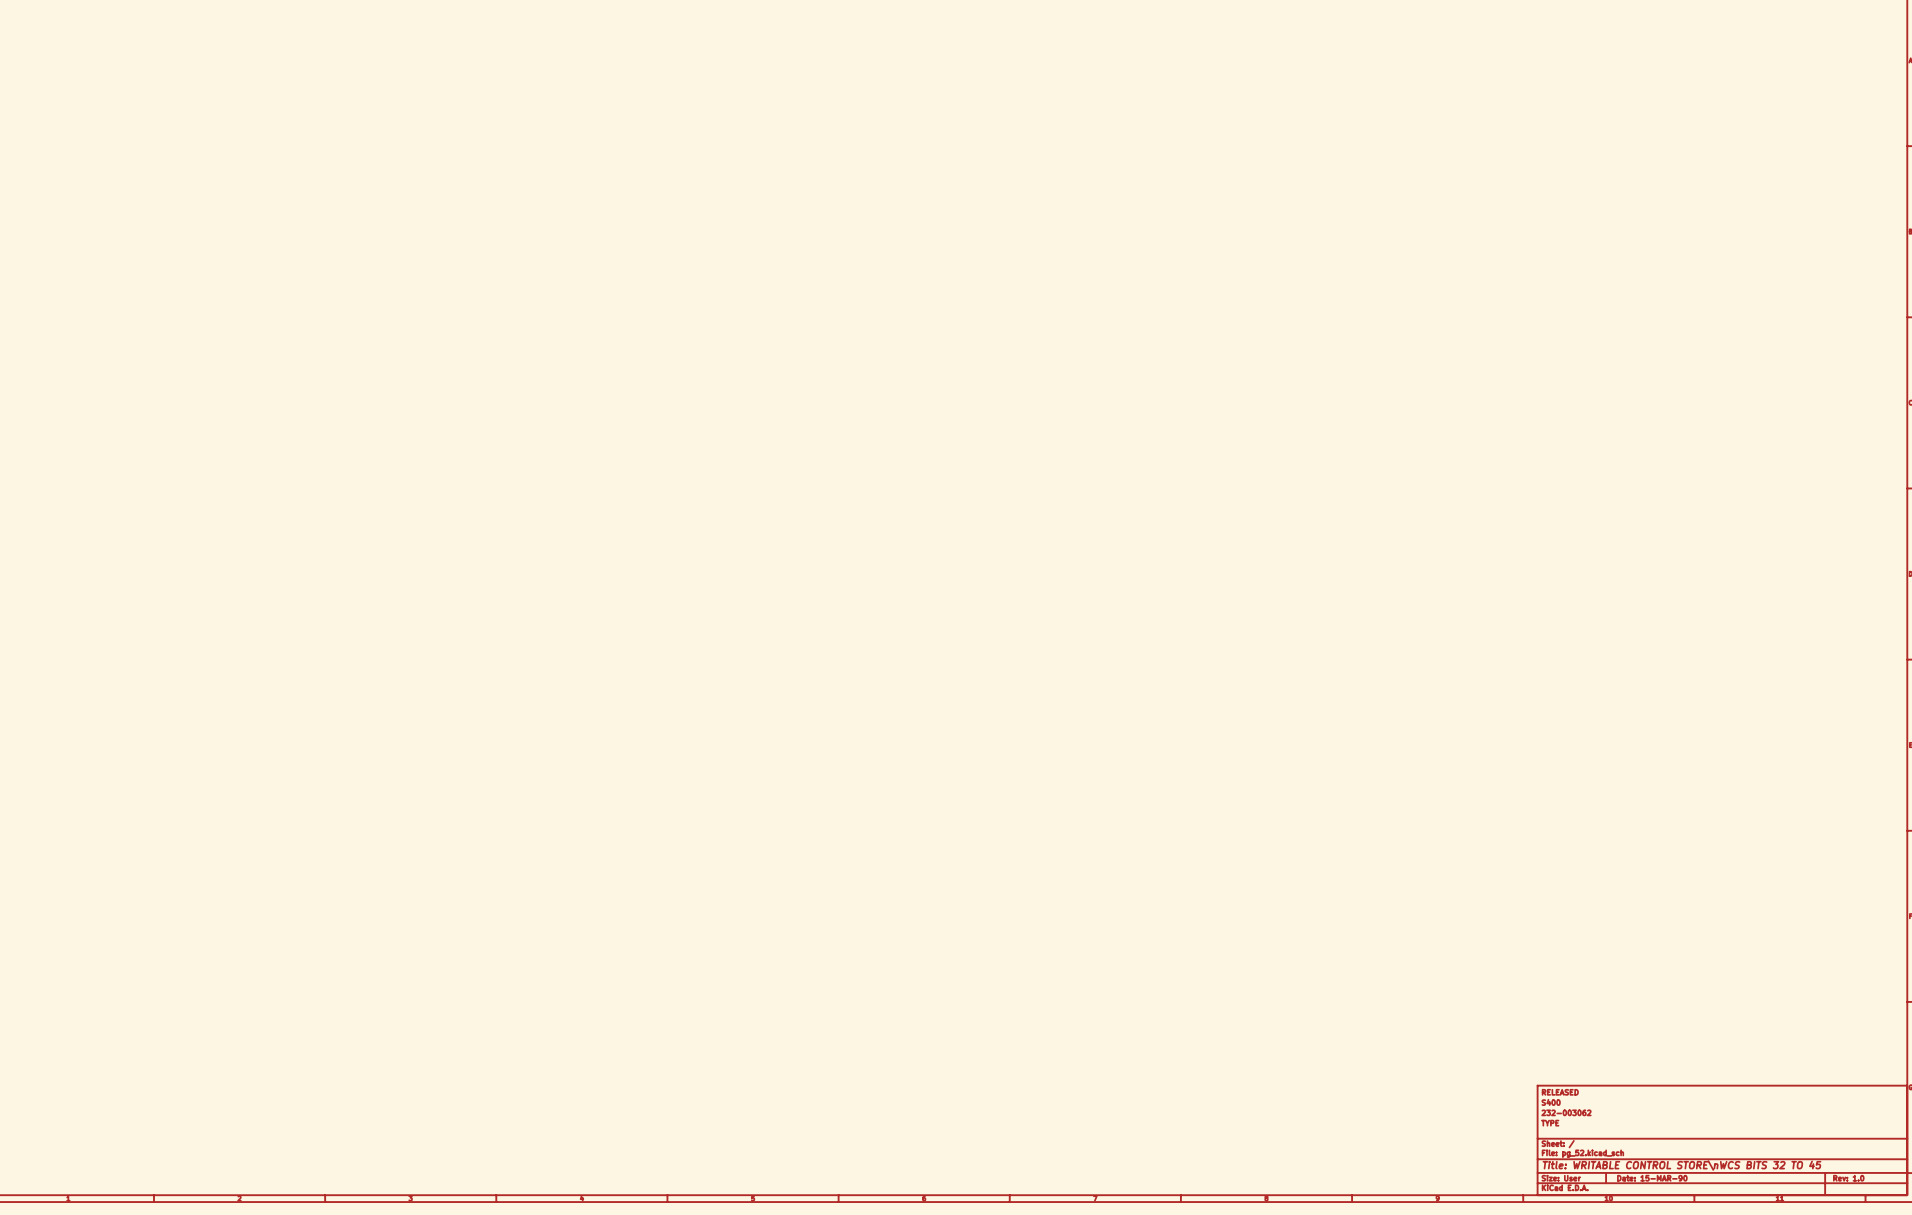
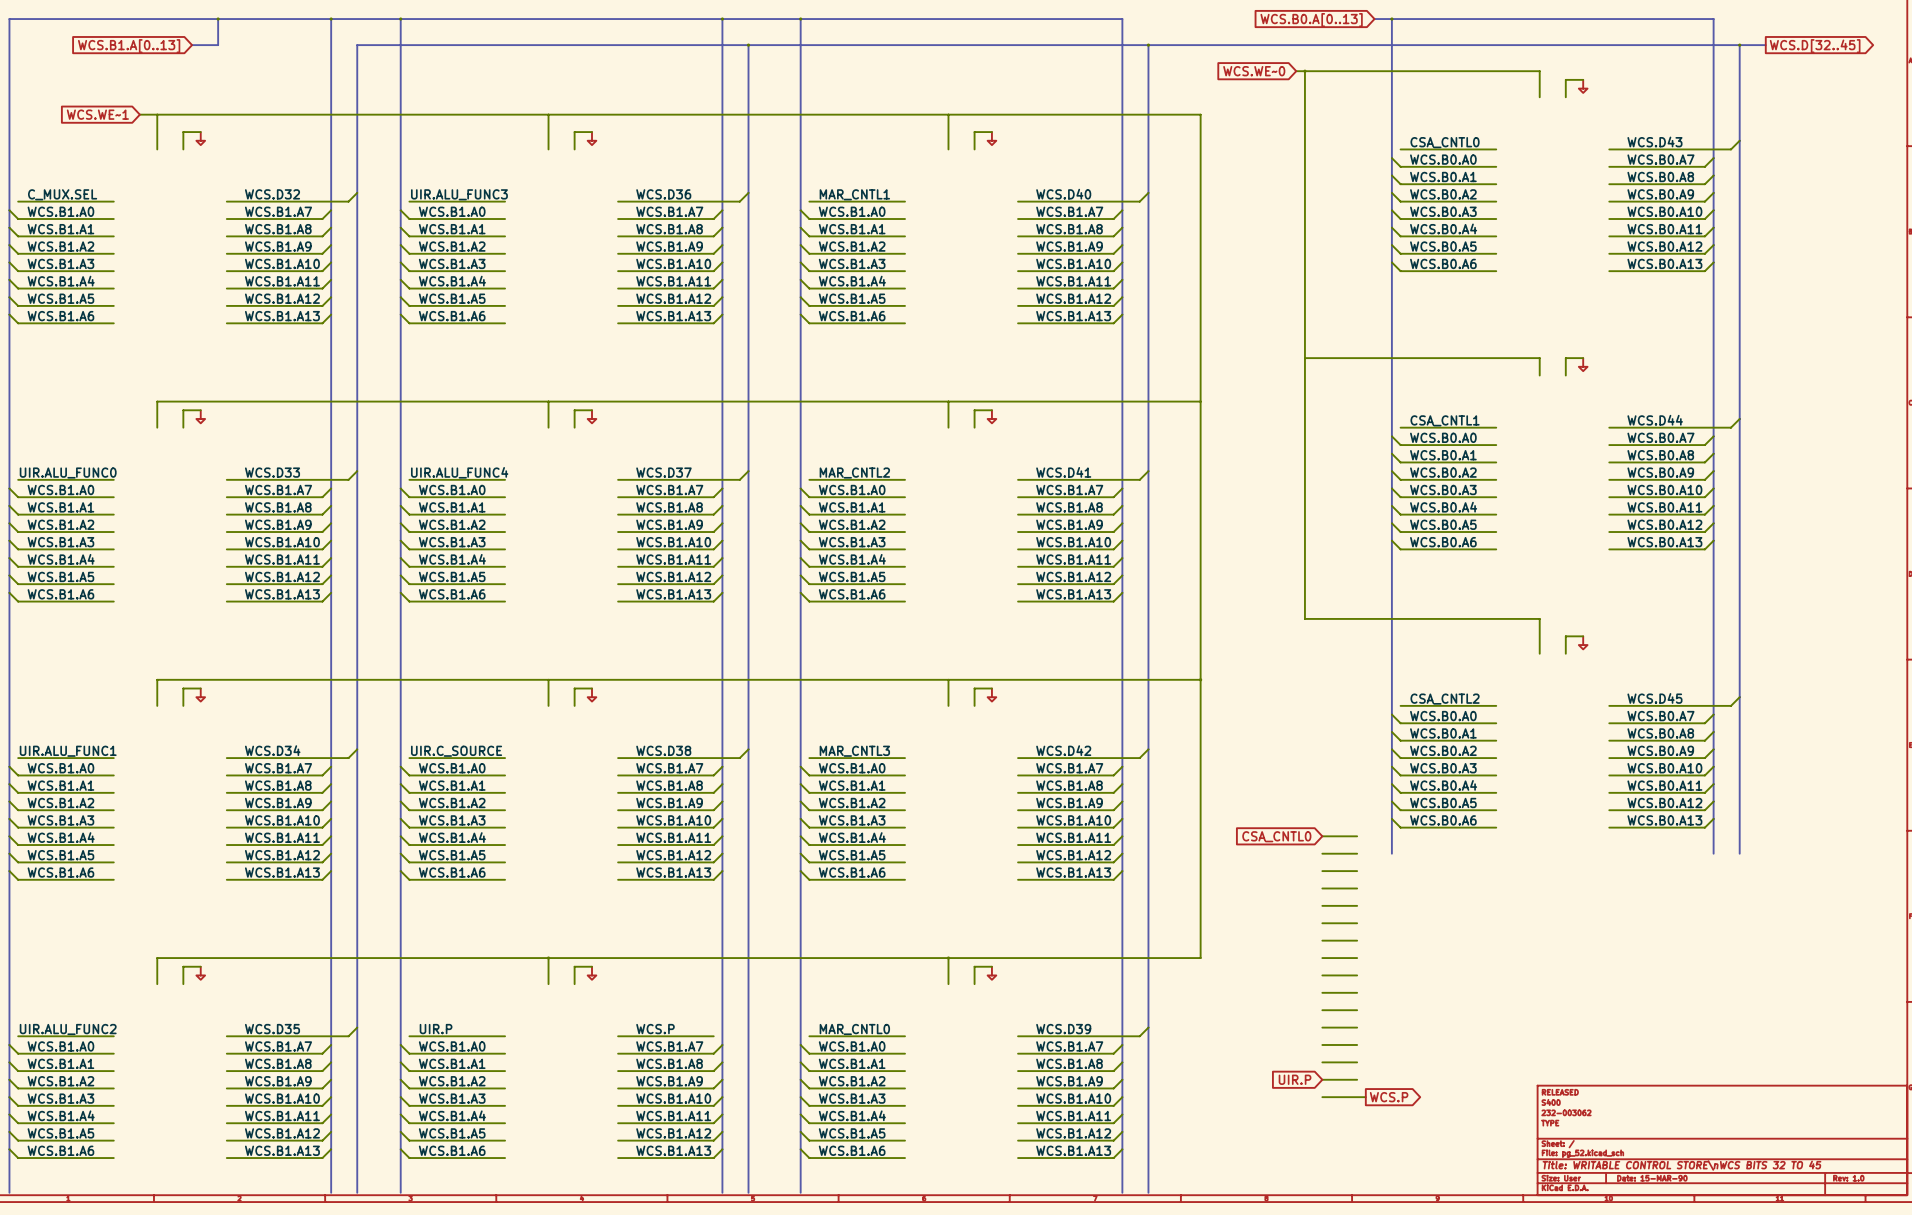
bus: none -> (218, 19) (218, 45) (192, 45)
junction: none -> (218, 19)
bus: none -> (331, 19) (331, 1192)
junction: none -> (331, 19)
bus: none -> (400, 19) (400, 1192)
junction: none -> (400, 19)
bus: none -> (722, 19) (722, 1192)
junction: none -> (722, 19)
bus: none -> (800, 19) (800, 1192)
junction: none -> (800, 19)
bus: none -> (1374, 19) (1713, 19) (1713, 853)
bus: none -> (1391, 19) (1391, 853)
junction: none -> (1391, 19)
global label: none -> WCS.B0.A[0..13] (1311, 20)
bus: none -> (748, 45) (748, 1192)
junction: none -> (748, 45)
bus: none -> (1148, 45) (1148, 1192)
junction: none -> (1148, 45)
bus: none -> (1739, 45) (1739, 853)
junction: none -> (1739, 45)
bus: none -> (1765, 45) (357, 45) (357, 1192)
global label: none -> WCS.B1.A[0..13] (129, 46)
global label: none -> WCS.D[32..45] (1815, 46)
global label: none -> WCS.WE~0 (1254, 71)
wire: none -> (1296, 71) (1539, 71) (1539, 97)
wire: none -> (1304, 71) (1304, 618) (1539, 618) (1539, 653)
wire: none -> (1583, 79) (1565, 79) (1565, 97)
power symbol: none -> (1583, 86)
global label: none -> WCS.WE~1 (97, 114)
wire: none -> (139, 114) (1200, 114) (1200, 958) (157, 958) (157, 984)
wire: none -> (157, 114) (157, 149)
wire: none -> (548, 114) (548, 149)
wire: none -> (948, 114) (948, 149)
wire: none -> (200, 132) (183, 132) (183, 149)
wire: none -> (592, 132) (574, 132) (574, 149)
wire: none -> (991, 132) (974, 132) (974, 149)
power symbol: none -> (200, 138)
power symbol: none -> (592, 138)
power symbol: none -> (991, 138)
wire: none -> (1739, 140) (1731, 149) (1609, 149)
label: none -> CSA_CNTL0 (1445, 142)
label: none -> WCS.D43 (1654, 142)
wire: none -> (1400, 149) (1496, 149)
wire: none -> (1391, 158) (1400, 166) (1496, 166)
wire: none -> (1713, 158) (1704, 166) (1609, 166)
label: none -> WCS.B0.A0 (1443, 159)
label: none -> WCS.B0.A7 (1660, 159)
wire: none -> (1391, 175) (1400, 184) (1496, 184)
wire: none -> (1713, 175) (1704, 184) (1609, 184)
label: none -> WCS.B0.A1 (1443, 176)
label: none -> WCS.B0.A8 (1660, 176)
wire: none -> (357, 192) (348, 201) (226, 201)
wire: none -> (748, 192) (739, 201) (618, 201)
wire: none -> (1148, 192) (1139, 201) (1018, 201)
wire: none -> (1391, 192) (1400, 201) (1496, 201)
wire: none -> (1713, 192) (1704, 201) (1609, 201)
label: none -> C_MUX.SEL (62, 194)
label: none -> WCS.D32 (272, 194)
label: none -> UIR.ALU_FUNC3 (459, 194)
label: none -> WCS.D36 (663, 194)
label: none -> MAR_CNTL1 (854, 194)
label: none -> WCS.D40 (1063, 194)
label: none -> WCS.B0.A2 (1443, 194)
label: none -> WCS.B0.A9 (1660, 194)
wire: none -> (18, 201) (113, 201)
wire: none -> (409, 201) (505, 201)
wire: none -> (809, 201) (905, 201)
wire: none -> (9, 210) (18, 219) (113, 219)
wire: none -> (331, 210) (322, 219) (226, 219)
wire: none -> (400, 210) (409, 219) (505, 219)
wire: none -> (722, 210) (713, 219) (618, 219)
wire: none -> (800, 210) (809, 219) (905, 219)
wire: none -> (1122, 210) (1113, 219) (1018, 219)
wire: none -> (1391, 210) (1400, 219) (1496, 219)
wire: none -> (1713, 210) (1704, 219) (1609, 219)
label: none -> WCS.B1.A0 (60, 211)
label: none -> WCS.B1.A7 (278, 211)
label: none -> WCS.B1.A0 (452, 211)
label: none -> WCS.B1.A7 (669, 211)
label: none -> WCS.B1.A0 (852, 211)
label: none -> WCS.B1.A7 (1069, 211)
label: none -> WCS.B0.A3 (1443, 211)
label: none -> WCS.B0.A10 (1664, 211)
wire: none -> (9, 227) (18, 236) (113, 236)
wire: none -> (331, 227) (322, 236) (226, 236)
wire: none -> (400, 227) (409, 236) (505, 236)
wire: none -> (722, 227) (713, 236) (618, 236)
wire: none -> (800, 227) (809, 236) (905, 236)
wire: none -> (1122, 227) (1113, 236) (1018, 236)
wire: none -> (1391, 227) (1400, 236) (1496, 236)
wire: none -> (1713, 227) (1704, 236) (1609, 236)
label: none -> WCS.B0.A4 (1443, 228)
label: none -> WCS.B1.A1 (60, 229)
label: none -> WCS.B1.A8 (278, 229)
label: none -> WCS.B1.A1 (452, 229)
label: none -> WCS.B1.A8 (669, 229)
label: none -> WCS.B1.A1 (852, 229)
label: none -> WCS.B1.A8 (1069, 229)
label: none -> WCS.B0.A11 (1664, 229)
wire: none -> (9, 245) (18, 253) (113, 253)
wire: none -> (331, 245) (322, 253) (226, 253)
wire: none -> (400, 245) (409, 253) (505, 253)
wire: none -> (722, 245) (713, 253) (618, 253)
wire: none -> (800, 245) (809, 253) (905, 253)
wire: none -> (1122, 245) (1113, 253) (1018, 253)
wire: none -> (1391, 245) (1400, 253) (1496, 253)
wire: none -> (1713, 245) (1704, 253) (1609, 253)
label: none -> WCS.B1.A2 (60, 246)
label: none -> WCS.B1.A9 (278, 246)
label: none -> WCS.B1.A2 (452, 246)
label: none -> WCS.B1.A9 (669, 246)
label: none -> WCS.B1.A2 (852, 246)
label: none -> WCS.B1.A9 (1069, 246)
label: none -> WCS.B0.A5 (1443, 246)
label: none -> WCS.B0.A12 (1664, 246)
wire: none -> (9, 262) (18, 271) (113, 271)
wire: none -> (331, 262) (322, 271) (226, 271)
wire: none -> (400, 262) (409, 271) (505, 271)
wire: none -> (722, 262) (713, 271) (618, 271)
wire: none -> (800, 262) (809, 271) (905, 271)
wire: none -> (1122, 262) (1113, 271) (1018, 271)
wire: none -> (1391, 262) (1400, 271) (1496, 271)
wire: none -> (1713, 262) (1704, 271) (1609, 271)
label: none -> WCS.B1.A3 (60, 263)
label: none -> WCS.B1.A10 (282, 263)
label: none -> WCS.B1.A3 (452, 263)
label: none -> WCS.B1.A10 (673, 263)
label: none -> WCS.B1.A3 (852, 263)
label: none -> WCS.B1.A10 (1073, 263)
label: none -> WCS.B0.A6 (1443, 263)
label: none -> WCS.B0.A13 (1664, 263)
wire: none -> (9, 279) (18, 288) (113, 288)
wire: none -> (331, 279) (322, 288) (226, 288)
wire: none -> (400, 279) (409, 288) (505, 288)
wire: none -> (722, 279) (713, 288) (618, 288)
wire: none -> (800, 279) (809, 288) (905, 288)
wire: none -> (1122, 279) (1113, 288) (1018, 288)
label: none -> WCS.B1.A4 (61, 281)
label: none -> WCS.B1.A11 (282, 281)
label: none -> WCS.B1.A4 (452, 281)
label: none -> WCS.B1.A11 (673, 281)
label: none -> WCS.B1.A4 (852, 281)
label: none -> WCS.B1.A11 (1073, 281)
wire: none -> (9, 297) (18, 305) (113, 305)
wire: none -> (331, 297) (322, 305) (226, 305)
wire: none -> (400, 297) (409, 305) (505, 305)
wire: none -> (722, 297) (713, 305) (618, 305)
wire: none -> (800, 297) (809, 305) (905, 305)
wire: none -> (1122, 297) (1113, 305) (1018, 305)
label: none -> WCS.B1.A5 (60, 298)
label: none -> WCS.B1.A12 (282, 298)
label: none -> WCS.B1.A5 (452, 298)
label: none -> WCS.B1.A12 (673, 298)
label: none -> WCS.B1.A5 (852, 298)
label: none -> WCS.B1.A12 (1073, 298)
wire: none -> (9, 314) (18, 323) (113, 323)
wire: none -> (331, 314) (322, 323) (226, 323)
wire: none -> (400, 314) (409, 323) (505, 323)
wire: none -> (722, 314) (713, 323) (618, 323)
wire: none -> (800, 314) (809, 323) (905, 323)
wire: none -> (1122, 314) (1113, 323) (1018, 323)
label: none -> WCS.B1.A6 (60, 316)
label: none -> WCS.B1.A13 (282, 316)
label: none -> WCS.B1.A6 (452, 316)
label: none -> WCS.B1.A13 (673, 316)
label: none -> WCS.B1.A6 (852, 316)
label: none -> WCS.B1.A13 (1073, 316)
wire: none -> (1304, 358) (1539, 358) (1539, 375)
wire: none -> (1583, 358) (1565, 358) (1565, 375)
power symbol: none -> (1583, 364)
wire: none -> (548, 401) (548, 427)
wire: none -> (948, 401) (948, 427)
wire: none -> (1200, 401) (157, 401) (157, 427)
wire: none -> (200, 410) (183, 410) (183, 427)
wire: none -> (592, 410) (574, 410) (574, 427)
wire: none -> (991, 410) (974, 410) (974, 427)
power symbol: none -> (200, 416)
power symbol: none -> (592, 416)
power symbol: none -> (991, 416)
wire: none -> (1739, 418) (1731, 427) (1609, 427)
label: none -> CSA_CNTL1 (1445, 420)
label: none -> WCS.D44 (1655, 420)
wire: none -> (1400, 427) (1496, 427)
wire: none -> (1391, 436) (1400, 445) (1496, 445)
wire: none -> (1713, 436) (1704, 445) (1609, 445)
label: none -> WCS.B0.A0 (1443, 437)
label: none -> WCS.B0.A7 (1660, 437)
wire: none -> (1391, 453) (1400, 462) (1496, 462)
wire: none -> (1713, 453) (1704, 462) (1609, 462)
label: none -> WCS.B0.A1 (1443, 455)
label: none -> WCS.B0.A8 (1660, 455)
wire: none -> (357, 471) (348, 479) (226, 479)
wire: none -> (748, 471) (739, 479) (618, 479)
wire: none -> (1148, 471) (1139, 479) (1018, 479)
wire: none -> (1391, 471) (1400, 479) (1496, 479)
wire: none -> (1713, 471) (1704, 479) (1609, 479)
label: none -> WCS.D33 (272, 472)
label: none -> UIR.ALU_FUNC4 (459, 472)
label: none -> WCS.D37 (663, 472)
label: none -> WCS.D41 (1063, 472)
label: none -> WCS.B0.A2 (1443, 472)
label: none -> WCS.B0.A9 (1660, 472)
label: none -> UIR.ALU_FUNC0 (68, 473)
label: none -> MAR_CNTL2 (854, 473)
wire: none -> (18, 479) (113, 479)
wire: none -> (409, 479) (505, 479)
wire: none -> (809, 479) (905, 479)
wire: none -> (9, 488) (18, 497) (113, 497)
wire: none -> (331, 488) (322, 497) (226, 497)
wire: none -> (400, 488) (409, 497) (505, 497)
wire: none -> (722, 488) (713, 497) (618, 497)
wire: none -> (800, 488) (809, 497) (905, 497)
wire: none -> (1122, 488) (1113, 497) (1018, 497)
wire: none -> (1391, 488) (1400, 497) (1496, 497)
wire: none -> (1713, 488) (1704, 497) (1609, 497)
label: none -> WCS.B1.A0 (60, 489)
label: none -> WCS.B1.A7 (278, 489)
label: none -> WCS.B1.A0 (452, 489)
label: none -> WCS.B1.A7 (669, 489)
label: none -> WCS.B1.A0 (852, 489)
label: none -> WCS.B1.A7 (1069, 489)
label: none -> WCS.B0.A3 (1443, 489)
label: none -> WCS.B0.A10 (1664, 489)
wire: none -> (9, 505) (18, 514) (113, 514)
wire: none -> (331, 505) (322, 514) (226, 514)
wire: none -> (400, 505) (409, 514) (505, 514)
wire: none -> (722, 505) (713, 514) (618, 514)
wire: none -> (800, 505) (809, 514) (905, 514)
wire: none -> (1122, 505) (1113, 514) (1018, 514)
wire: none -> (1391, 505) (1400, 514) (1496, 514)
wire: none -> (1713, 505) (1704, 514) (1609, 514)
label: none -> WCS.B1.A1 (60, 507)
label: none -> WCS.B1.A8 (278, 507)
label: none -> WCS.B1.A1 (452, 507)
label: none -> WCS.B1.A8 (669, 507)
label: none -> WCS.B1.A1 (852, 507)
label: none -> WCS.B1.A8 (1069, 507)
label: none -> WCS.B0.A4 (1443, 507)
label: none -> WCS.B0.A11 (1664, 507)
wire: none -> (9, 523) (18, 532) (113, 532)
wire: none -> (331, 523) (322, 532) (226, 532)
wire: none -> (400, 523) (409, 532) (505, 532)
wire: none -> (722, 523) (713, 532) (618, 532)
wire: none -> (800, 523) (809, 532) (905, 532)
wire: none -> (1122, 523) (1113, 532) (1018, 532)
wire: none -> (1391, 523) (1400, 532) (1496, 532)
wire: none -> (1713, 523) (1704, 532) (1609, 532)
label: none -> WCS.B1.A2 (60, 524)
label: none -> WCS.B1.A9 (278, 524)
label: none -> WCS.B1.A2 (452, 524)
label: none -> WCS.B1.A9 (669, 524)
label: none -> WCS.B1.A2 (852, 524)
label: none -> WCS.B1.A9 (1069, 524)
label: none -> WCS.B0.A5 (1443, 524)
label: none -> WCS.B0.A12 (1664, 524)
wire: none -> (9, 540) (18, 549) (113, 549)
wire: none -> (331, 540) (322, 549) (226, 549)
wire: none -> (400, 540) (409, 549) (505, 549)
wire: none -> (722, 540) (713, 549) (618, 549)
wire: none -> (800, 540) (809, 549) (905, 549)
wire: none -> (1122, 540) (1113, 549) (1018, 549)
wire: none -> (1391, 540) (1400, 549) (1496, 549)
wire: none -> (1713, 540) (1704, 549) (1609, 549)
label: none -> WCS.B1.A3 (60, 542)
label: none -> WCS.B1.A10 (282, 542)
label: none -> WCS.B1.A3 (452, 542)
label: none -> WCS.B1.A10 (673, 542)
label: none -> WCS.B1.A3 (852, 542)
label: none -> WCS.B1.A10 (1073, 542)
label: none -> WCS.B0.A6 (1443, 542)
label: none -> WCS.B0.A13 (1664, 542)
wire: none -> (9, 558) (18, 566) (113, 566)
wire: none -> (331, 558) (322, 566) (226, 566)
wire: none -> (400, 558) (409, 566) (505, 566)
wire: none -> (722, 558) (713, 566) (618, 566)
wire: none -> (800, 558) (809, 566) (905, 566)
wire: none -> (1122, 558) (1113, 566) (1018, 566)
label: none -> WCS.B1.A4 (61, 559)
label: none -> WCS.B1.A11 (282, 559)
label: none -> WCS.B1.A4 (452, 559)
label: none -> WCS.B1.A11 (673, 559)
label: none -> WCS.B1.A4 (852, 559)
label: none -> WCS.B1.A11 (1073, 559)
wire: none -> (9, 575) (18, 584) (113, 584)
wire: none -> (331, 575) (322, 584) (226, 584)
wire: none -> (400, 575) (409, 584) (505, 584)
wire: none -> (722, 575) (713, 584) (618, 584)
wire: none -> (800, 575) (809, 584) (905, 584)
wire: none -> (1122, 575) (1113, 584) (1018, 584)
label: none -> WCS.B1.A5 (60, 576)
label: none -> WCS.B1.A12 (282, 576)
label: none -> WCS.B1.A5 (452, 576)
label: none -> WCS.B1.A12 (673, 576)
label: none -> WCS.B1.A5 (852, 576)
label: none -> WCS.B1.A12 (1073, 576)
wire: none -> (9, 592) (18, 601) (113, 601)
wire: none -> (331, 592) (322, 601) (226, 601)
wire: none -> (400, 592) (409, 601) (505, 601)
wire: none -> (722, 592) (713, 601) (618, 601)
wire: none -> (800, 592) (809, 601) (905, 601)
wire: none -> (1122, 592) (1113, 601) (1018, 601)
label: none -> WCS.B1.A6 (60, 594)
label: none -> WCS.B1.A13 (282, 594)
label: none -> WCS.B1.A6 (452, 594)
label: none -> WCS.B1.A13 (673, 594)
label: none -> WCS.B1.A6 (852, 594)
label: none -> WCS.B1.A13 (1073, 594)
wire: none -> (1583, 636) (1565, 636) (1565, 653)
power symbol: none -> (1583, 642)
wire: none -> (548, 679) (548, 705)
wire: none -> (948, 679) (948, 705)
wire: none -> (1200, 679) (157, 679) (157, 705)
wire: none -> (200, 688) (183, 688) (183, 705)
wire: none -> (592, 688) (574, 688) (574, 705)
wire: none -> (991, 688) (974, 688) (974, 705)
power symbol: none -> (200, 695)
power symbol: none -> (592, 695)
power symbol: none -> (991, 695)
wire: none -> (1739, 697) (1731, 705) (1609, 705)
label: none -> WCS.D45 (1654, 698)
label: none -> CSA_CNTL2 (1445, 699)
wire: none -> (1400, 705) (1496, 705)
wire: none -> (1391, 714) (1400, 723) (1496, 723)
wire: none -> (1713, 714) (1704, 723) (1609, 723)
label: none -> WCS.B0.A0 (1443, 716)
label: none -> WCS.B0.A7 (1660, 716)
wire: none -> (1391, 731) (1400, 740) (1496, 740)
wire: none -> (1713, 731) (1704, 740) (1609, 740)
label: none -> WCS.B0.A1 (1443, 733)
label: none -> WCS.B0.A8 (1660, 733)
wire: none -> (357, 749) (348, 758) (226, 758)
wire: none -> (748, 749) (739, 758) (618, 758)
wire: none -> (1148, 749) (1139, 758) (1018, 758)
wire: none -> (1391, 749) (1400, 758) (1496, 758)
wire: none -> (1713, 749) (1704, 758) (1609, 758)
label: none -> WCS.D34 (272, 750)
label: none -> WCS.D38 (663, 750)
label: none -> WCS.D42 (1063, 750)
label: none -> WCS.B0.A2 (1443, 750)
label: none -> WCS.B0.A9 (1660, 750)
label: none -> UIR.ALU_FUNC1 (68, 751)
label: none -> UIR.C_SOURCE (456, 751)
label: none -> MAR_CNTL3 (854, 751)
wire: none -> (18, 758) (113, 758)
wire: none -> (409, 758) (505, 758)
wire: none -> (809, 758) (905, 758)
wire: none -> (9, 766) (18, 775) (113, 775)
wire: none -> (331, 766) (322, 775) (226, 775)
wire: none -> (400, 766) (409, 775) (505, 775)
wire: none -> (722, 766) (713, 775) (618, 775)
wire: none -> (800, 766) (809, 775) (905, 775)
wire: none -> (1122, 766) (1113, 775) (1018, 775)
wire: none -> (1391, 766) (1400, 775) (1496, 775)
wire: none -> (1713, 766) (1704, 775) (1609, 775)
label: none -> WCS.B1.A0 (60, 768)
label: none -> WCS.B1.A7 (278, 768)
label: none -> WCS.B1.A0 (452, 768)
label: none -> WCS.B1.A7 (669, 768)
label: none -> WCS.B1.A0 (852, 768)
label: none -> WCS.B1.A7 (1069, 768)
label: none -> WCS.B0.A3 (1443, 768)
label: none -> WCS.B0.A10 (1664, 768)
wire: none -> (9, 784) (18, 792) (113, 792)
wire: none -> (331, 784) (322, 792) (226, 792)
wire: none -> (400, 784) (409, 792) (505, 792)
wire: none -> (722, 784) (713, 792) (618, 792)
wire: none -> (800, 784) (809, 792) (905, 792)
wire: none -> (1122, 784) (1113, 792) (1018, 792)
wire: none -> (1391, 784) (1400, 792) (1496, 792)
wire: none -> (1713, 784) (1704, 792) (1609, 792)
label: none -> WCS.B1.A1 (60, 785)
label: none -> WCS.B1.A8 (278, 785)
label: none -> WCS.B1.A1 (452, 785)
label: none -> WCS.B1.A8 (669, 785)
label: none -> WCS.B1.A1 (852, 785)
label: none -> WCS.B1.A8 (1069, 785)
label: none -> WCS.B0.A4 (1443, 785)
label: none -> WCS.B0.A11 (1664, 785)
wire: none -> (9, 801) (18, 810) (113, 810)
wire: none -> (331, 801) (322, 810) (226, 810)
wire: none -> (400, 801) (409, 810) (505, 810)
wire: none -> (722, 801) (713, 810) (618, 810)
wire: none -> (800, 801) (809, 810) (905, 810)
wire: none -> (1122, 801) (1113, 810) (1018, 810)
wire: none -> (1391, 801) (1400, 810) (1496, 810)
wire: none -> (1713, 801) (1704, 810) (1609, 810)
label: none -> WCS.B1.A2 (60, 803)
label: none -> WCS.B1.A9 (278, 803)
label: none -> WCS.B1.A2 (452, 803)
label: none -> WCS.B1.A9 (669, 803)
label: none -> WCS.B1.A2 (852, 803)
label: none -> WCS.B1.A9 (1069, 803)
label: none -> WCS.B0.A5 (1443, 803)
label: none -> WCS.B0.A12 (1664, 803)
wire: none -> (9, 818) (18, 827) (113, 827)
wire: none -> (331, 818) (322, 827) (226, 827)
wire: none -> (400, 818) (409, 827) (505, 827)
wire: none -> (722, 818) (713, 827) (618, 827)
wire: none -> (800, 818) (809, 827) (905, 827)
wire: none -> (1122, 818) (1113, 827) (1018, 827)
wire: none -> (1391, 818) (1400, 827) (1496, 827)
wire: none -> (1713, 818) (1704, 827) (1609, 827)
label: none -> WCS.B1.A3 (60, 820)
label: none -> WCS.B1.A10 (282, 820)
label: none -> WCS.B1.A3 (452, 820)
label: none -> WCS.B1.A10 (673, 820)
label: none -> WCS.B1.A3 (852, 820)
label: none -> WCS.B1.A10 (1073, 820)
label: none -> WCS.B0.A6 (1443, 820)
label: none -> WCS.B0.A13 (1664, 820)
wire: none -> (9, 836) (18, 845) (113, 845)
wire: none -> (331, 836) (322, 845) (226, 845)
wire: none -> (400, 836) (409, 845) (505, 845)
wire: none -> (722, 836) (713, 845) (618, 845)
wire: none -> (800, 836) (809, 845) (905, 845)
wire: none -> (1122, 836) (1113, 845) (1018, 845)
global label: none -> CSA_CNTL0 (1276, 836)
wire: none -> (1322, 836) (1357, 836)
label: none -> WCS.B1.A4 (61, 837)
label: none -> WCS.B1.A11 (282, 837)
label: none -> WCS.B1.A4 (452, 837)
label: none -> WCS.B1.A11 (673, 837)
label: none -> WCS.B1.A4 (852, 837)
label: none -> WCS.B1.A11 (1073, 837)
wire: none -> (9, 853) (18, 862) (113, 862)
wire: none -> (331, 853) (322, 862) (226, 862)
wire: none -> (400, 853) (409, 862) (505, 862)
wire: none -> (722, 853) (713, 862) (618, 862)
wire: none -> (800, 853) (809, 862) (905, 862)
wire: none -> (1122, 853) (1113, 862) (1018, 862)
wire: none -> (1322, 853) (1357, 853)
label: none -> WCS.B1.A5 (60, 855)
label: none -> WCS.B1.A12 (282, 855)
label: none -> WCS.B1.A5 (452, 855)
label: none -> WCS.B1.A12 (673, 855)
label: none -> WCS.B1.A5 (852, 855)
label: none -> WCS.B1.A12 (1073, 855)
wire: none -> (9, 871) (18, 879) (113, 879)
wire: none -> (331, 871) (322, 879) (226, 879)
wire: none -> (400, 871) (409, 879) (505, 879)
wire: none -> (722, 871) (713, 879) (618, 879)
wire: none -> (800, 871) (809, 879) (905, 879)
wire: none -> (1122, 871) (1113, 879) (1018, 879)
wire: none -> (1322, 871) (1357, 871)
label: none -> WCS.B1.A6 (60, 872)
label: none -> WCS.B1.A13 (282, 872)
label: none -> WCS.B1.A6 (452, 872)
label: none -> WCS.B1.A13 (673, 872)
label: none -> WCS.B1.A6 (852, 872)
label: none -> WCS.B1.A13 (1073, 872)
wire: none -> (1322, 888) (1357, 888)
wire: none -> (1322, 905) (1357, 905)
wire: none -> (1322, 923) (1357, 923)
wire: none -> (1322, 940) (1357, 940)
wire: none -> (548, 958) (548, 984)
wire: none -> (948, 958) (948, 984)
wire: none -> (1322, 958) (1357, 958)
wire: none -> (200, 966) (183, 966) (183, 984)
wire: none -> (592, 966) (574, 966) (574, 984)
wire: none -> (991, 966) (974, 966) (974, 984)
power symbol: none -> (200, 973)
power symbol: none -> (592, 973)
power symbol: none -> (991, 973)
wire: none -> (1322, 975) (1357, 975)
wire: none -> (1322, 992) (1357, 992)
wire: none -> (1322, 1010) (1357, 1010)
wire: none -> (357, 1027) (348, 1036) (226, 1036)
wire: none -> (1148, 1027) (1139, 1036) (1018, 1036)
wire: none -> (1322, 1027) (1357, 1027)
label: none -> UIR.ALU_FUNC2 (68, 1029)
label: none -> WCS.D35 (272, 1029)
label: none -> UIR.P (436, 1029)
label: none -> WCS.P (655, 1029)
label: none -> MAR_CNTL0 (854, 1029)
label: none -> WCS.D39 (1063, 1029)
wire: none -> (18, 1036) (113, 1036)
wire: none -> (409, 1036) (505, 1036)
wire: none -> (618, 1036) (713, 1036)
wire: none -> (809, 1036) (905, 1036)
wire: none -> (9, 1044) (18, 1053) (113, 1053)
wire: none -> (331, 1044) (322, 1053) (226, 1053)
wire: none -> (400, 1044) (409, 1053) (505, 1053)
wire: none -> (722, 1044) (713, 1053) (618, 1053)
wire: none -> (800, 1044) (809, 1053) (905, 1053)
wire: none -> (1122, 1044) (1113, 1053) (1018, 1053)
wire: none -> (1322, 1044) (1357, 1044)
label: none -> WCS.B1.A0 (60, 1046)
label: none -> WCS.B1.A7 (278, 1046)
label: none -> WCS.B1.A0 (452, 1046)
label: none -> WCS.B1.A7 (669, 1046)
label: none -> WCS.B1.A0 (852, 1046)
label: none -> WCS.B1.A7 (1069, 1046)
wire: none -> (9, 1062) (18, 1071) (113, 1071)
wire: none -> (331, 1062) (322, 1071) (226, 1071)
wire: none -> (400, 1062) (409, 1071) (505, 1071)
wire: none -> (722, 1062) (713, 1071) (618, 1071)
wire: none -> (800, 1062) (809, 1071) (905, 1071)
wire: none -> (1122, 1062) (1113, 1071) (1018, 1071)
wire: none -> (1322, 1062) (1357, 1062)
label: none -> WCS.B1.A1 (60, 1063)
label: none -> WCS.B1.A8 (278, 1063)
label: none -> WCS.B1.A1 (452, 1063)
label: none -> WCS.B1.A8 (669, 1063)
label: none -> WCS.B1.A1 (852, 1063)
label: none -> WCS.B1.A8 (1069, 1063)
wire: none -> (9, 1079) (18, 1088) (113, 1088)
wire: none -> (331, 1079) (322, 1088) (226, 1088)
wire: none -> (400, 1079) (409, 1088) (505, 1088)
wire: none -> (722, 1079) (713, 1088) (618, 1088)
wire: none -> (800, 1079) (809, 1088) (905, 1088)
wire: none -> (1122, 1079) (1113, 1088) (1018, 1088)
global label: none -> UIR.P (1295, 1079)
wire: none -> (1322, 1079) (1357, 1079)
label: none -> WCS.B1.A2 (60, 1081)
label: none -> WCS.B1.A9 (278, 1081)
label: none -> WCS.B1.A2 (452, 1081)
label: none -> WCS.B1.A9 (669, 1081)
label: none -> WCS.B1.A2 (852, 1081)
label: none -> WCS.B1.A9 (1069, 1081)
wire: none -> (9, 1097) (18, 1105) (113, 1105)
wire: none -> (331, 1097) (322, 1105) (226, 1105)
wire: none -> (400, 1097) (409, 1105) (505, 1105)
wire: none -> (722, 1097) (713, 1105) (618, 1105)
wire: none -> (800, 1097) (809, 1105) (905, 1105)
wire: none -> (1122, 1097) (1113, 1105) (1018, 1105)
wire: none -> (1322, 1097) (1365, 1097)
global label: none -> WCS.P (1389, 1097)
label: none -> WCS.B1.A3 (60, 1098)
label: none -> WCS.B1.A10 (282, 1098)
label: none -> WCS.B1.A3 (452, 1098)
label: none -> WCS.B1.A10 (673, 1098)
label: none -> WCS.B1.A3 (852, 1098)
label: none -> WCS.B1.A10 (1073, 1098)
wire: none -> (9, 1114) (18, 1123) (113, 1123)
wire: none -> (331, 1114) (322, 1123) (226, 1123)
wire: none -> (400, 1114) (409, 1123) (505, 1123)
wire: none -> (722, 1114) (713, 1123) (618, 1123)
wire: none -> (800, 1114) (809, 1123) (905, 1123)
wire: none -> (1122, 1114) (1113, 1123) (1018, 1123)
label: none -> WCS.B1.A4 (61, 1115)
label: none -> WCS.B1.A4 (452, 1115)
label: none -> WCS.B1.A4 (852, 1115)
label: none -> WCS.B1.A11 (282, 1116)
label: none -> WCS.B1.A11 (673, 1116)
label: none -> WCS.B1.A11 (1073, 1116)
wire: none -> (9, 1131) (18, 1140) (113, 1140)
wire: none -> (331, 1131) (322, 1140) (226, 1140)
wire: none -> (400, 1131) (409, 1140) (505, 1140)
wire: none -> (722, 1131) (713, 1140) (618, 1140)
wire: none -> (800, 1131) (809, 1140) (905, 1140)
wire: none -> (1122, 1131) (1113, 1140) (1018, 1140)
label: none -> WCS.B1.A5 (60, 1133)
label: none -> WCS.B1.A12 (282, 1133)
label: none -> WCS.B1.A5 (452, 1133)
label: none -> WCS.B1.A12 (673, 1133)
label: none -> WCS.B1.A5 (852, 1133)
label: none -> WCS.B1.A12 (1073, 1133)
wire: none -> (9, 1149) (18, 1158) (113, 1158)
wire: none -> (331, 1149) (322, 1158) (226, 1158)
wire: none -> (400, 1149) (409, 1158) (505, 1158)
wire: none -> (722, 1149) (713, 1158) (618, 1158)
wire: none -> (800, 1149) (809, 1158) (905, 1158)
wire: none -> (1122, 1149) (1113, 1158) (1018, 1158)
label: none -> WCS.B1.A6 (60, 1150)
label: none -> WCS.B1.A13 (282, 1150)
label: none -> WCS.B1.A6 (452, 1150)
label: none -> WCS.B1.A13 (673, 1150)
label: none -> WCS.B1.A6 (852, 1150)
label: none -> WCS.B1.A13 (1073, 1150)
bus: none -> (9, 1192) (9, 19) (1122, 19) (1122, 1192)

